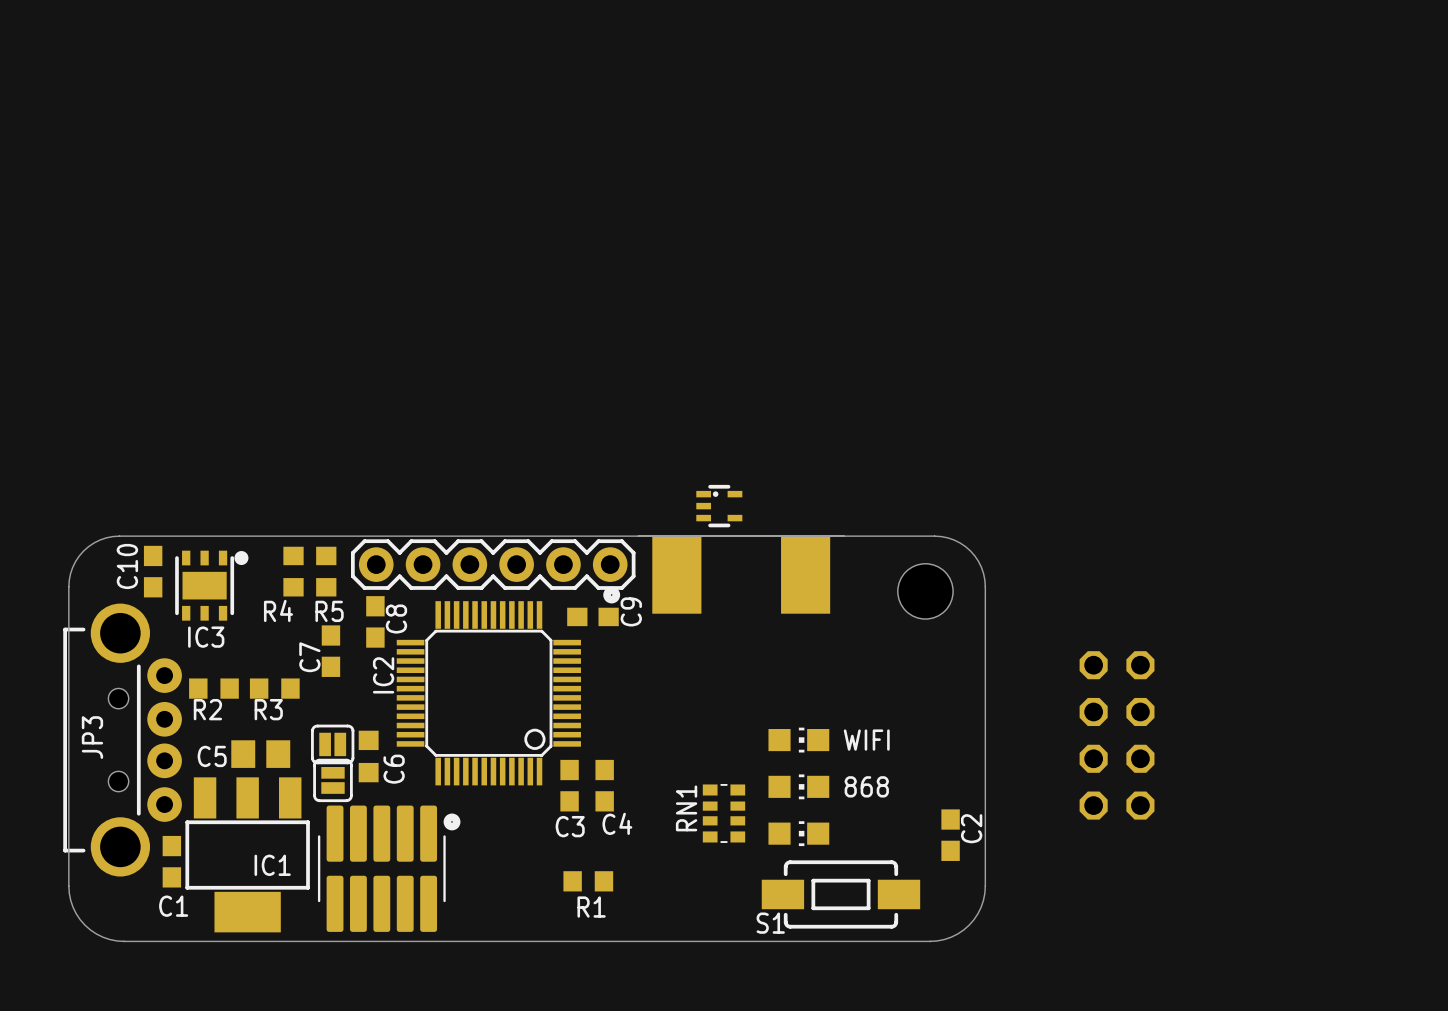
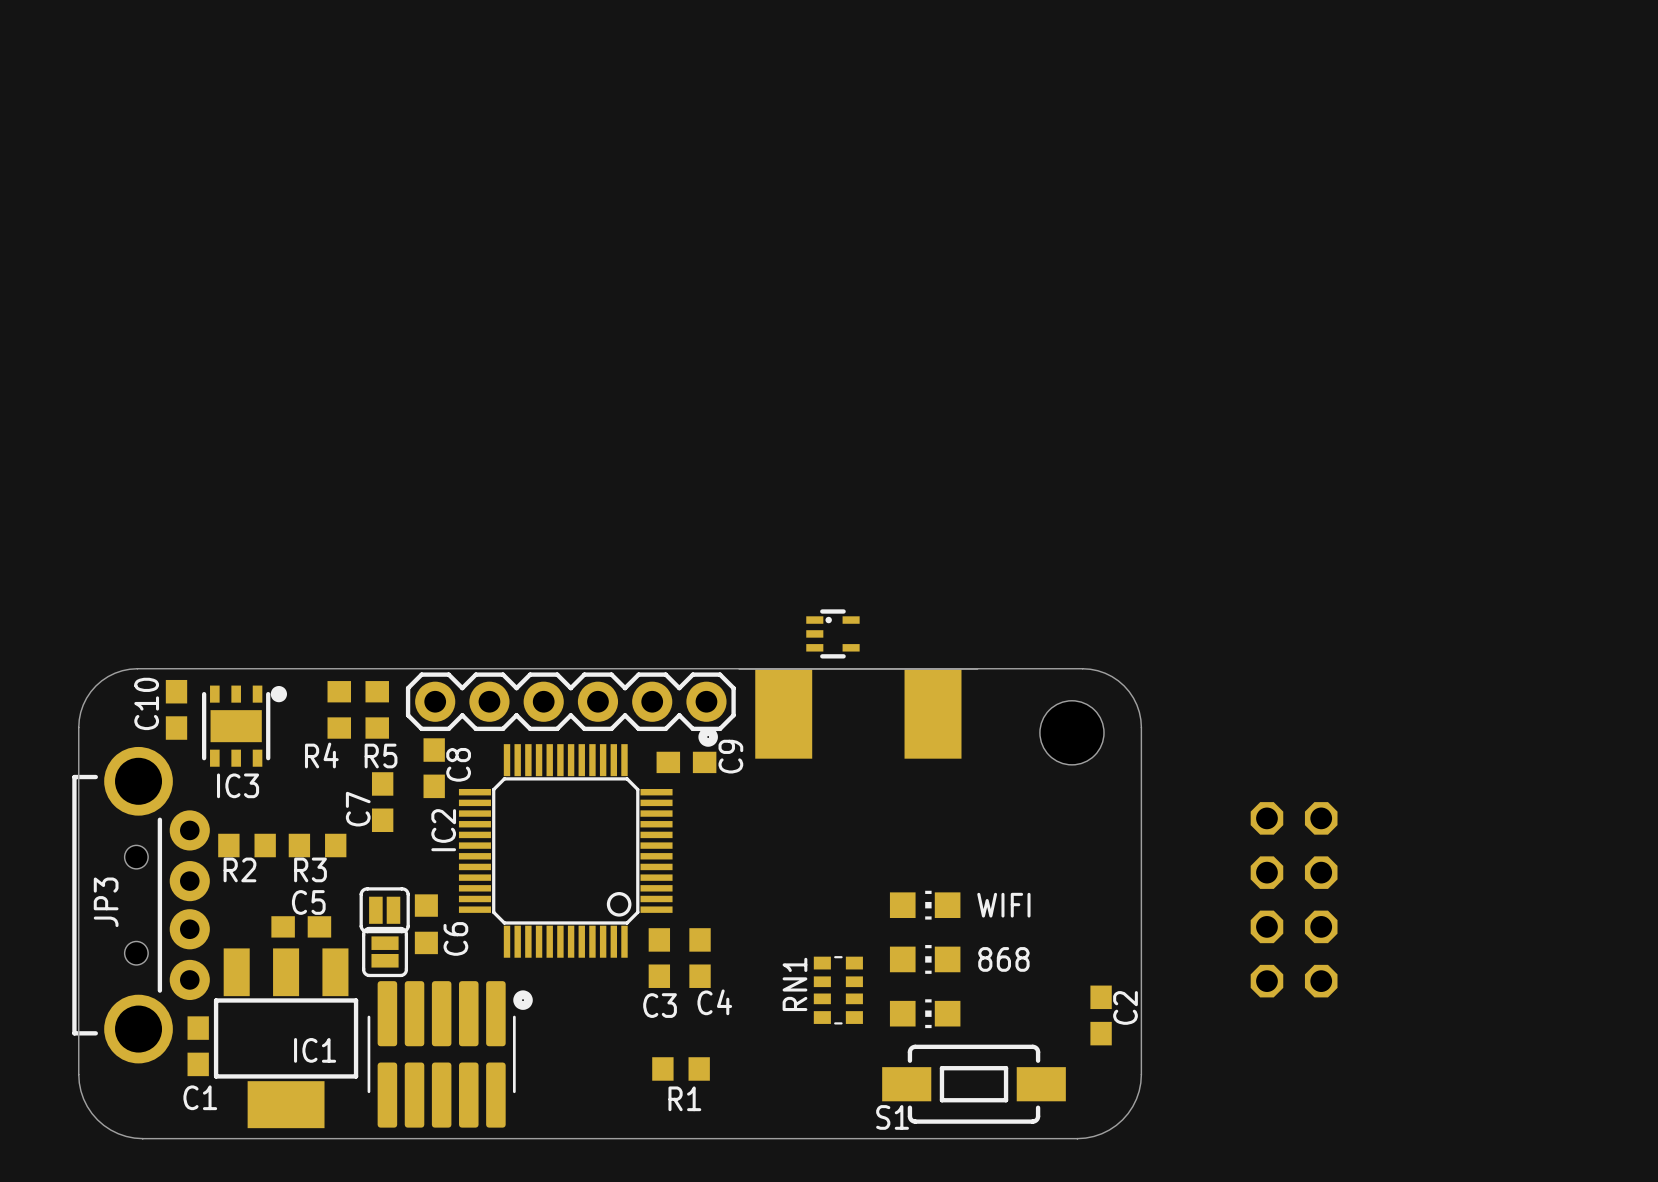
C5 footprint: [231, 740, 291, 768] -> [271, 916, 332, 938]
C5 name position: C5 (212, 756) -> C5 (308, 902)

